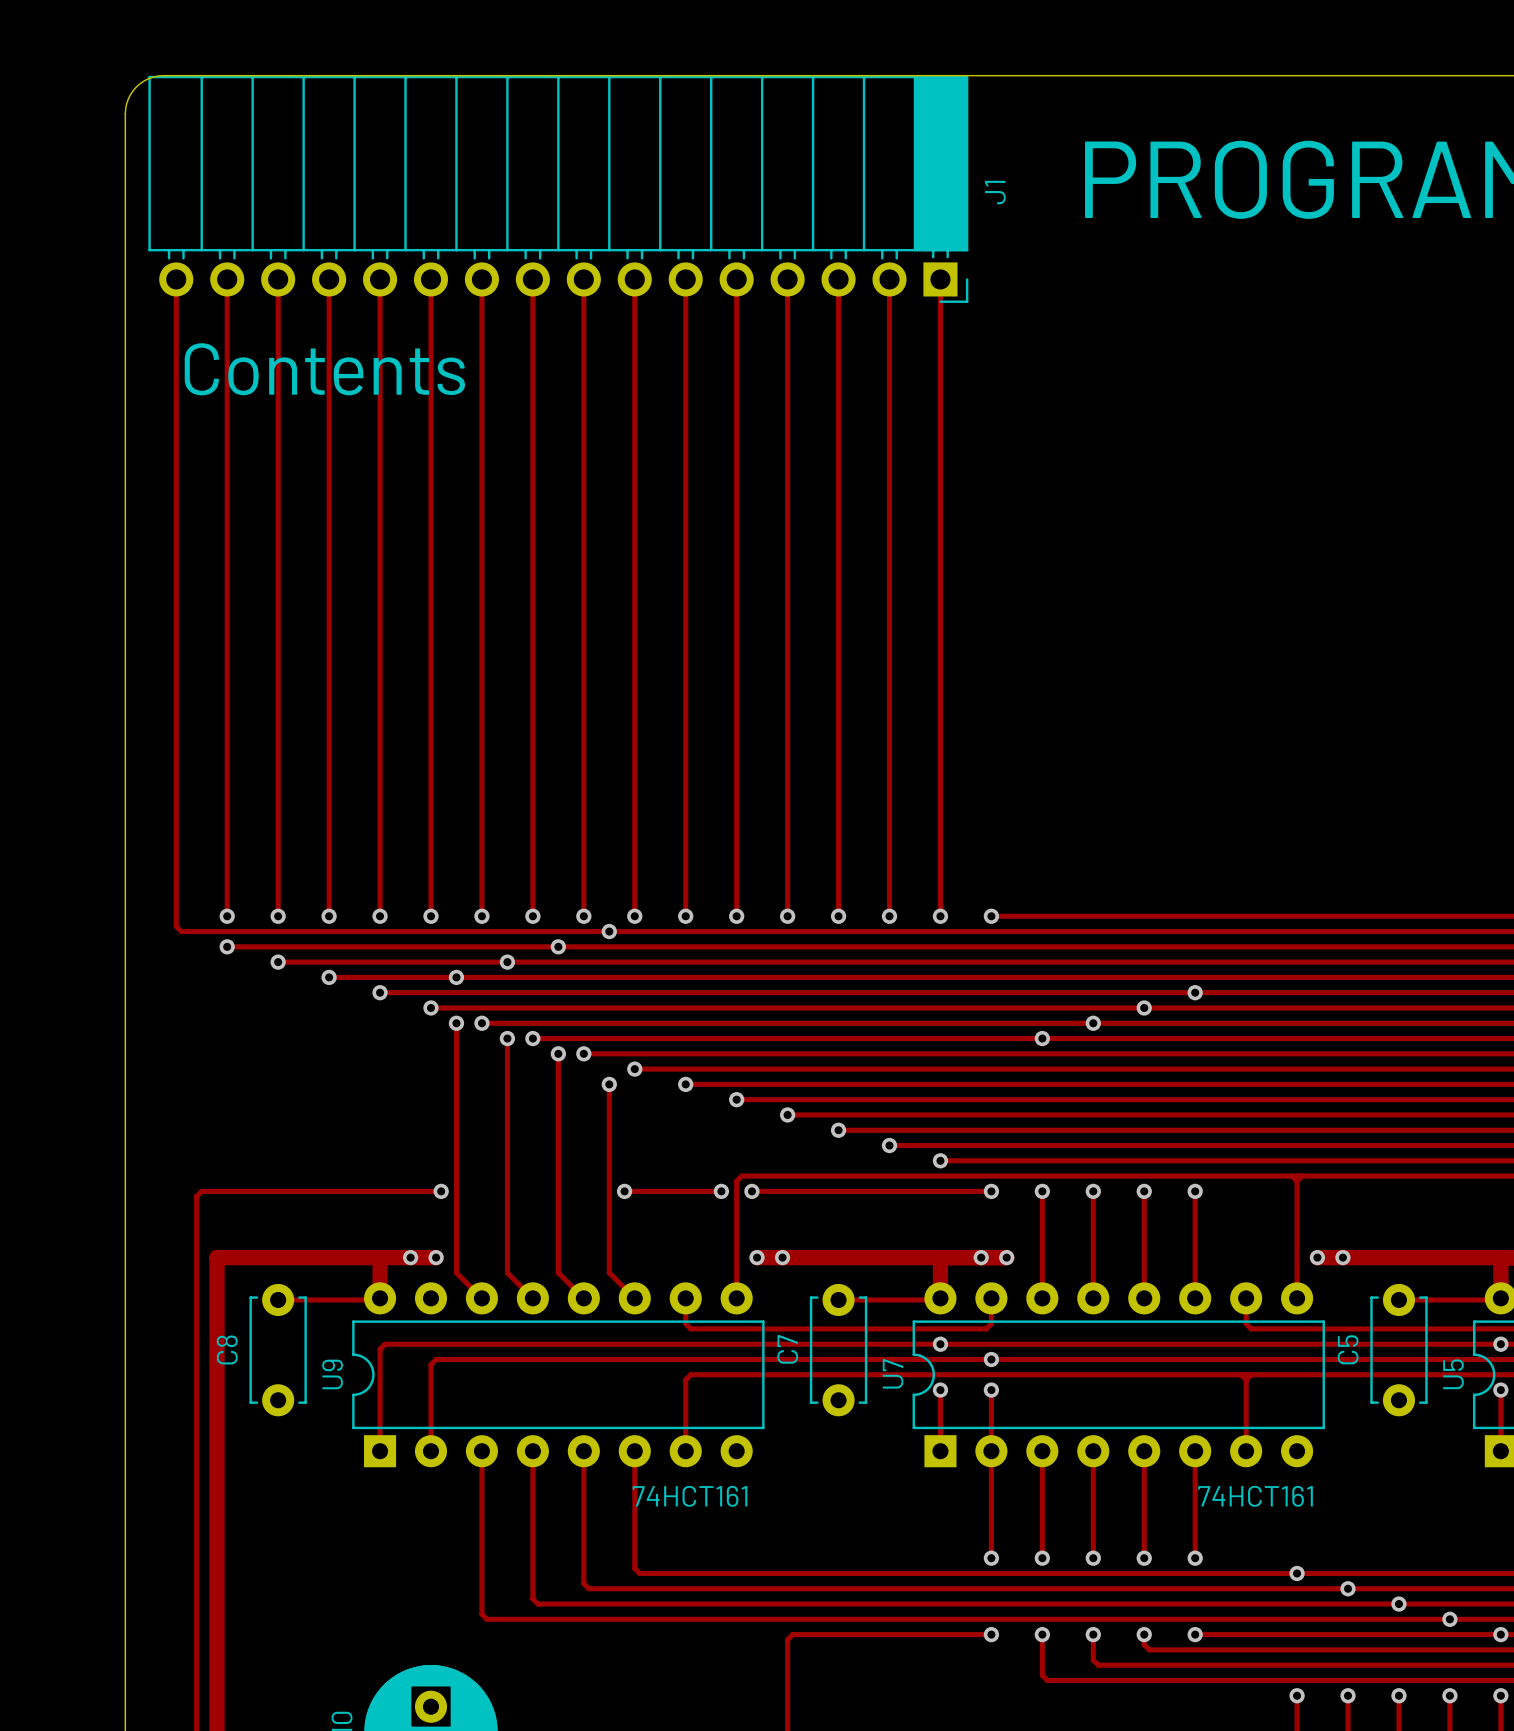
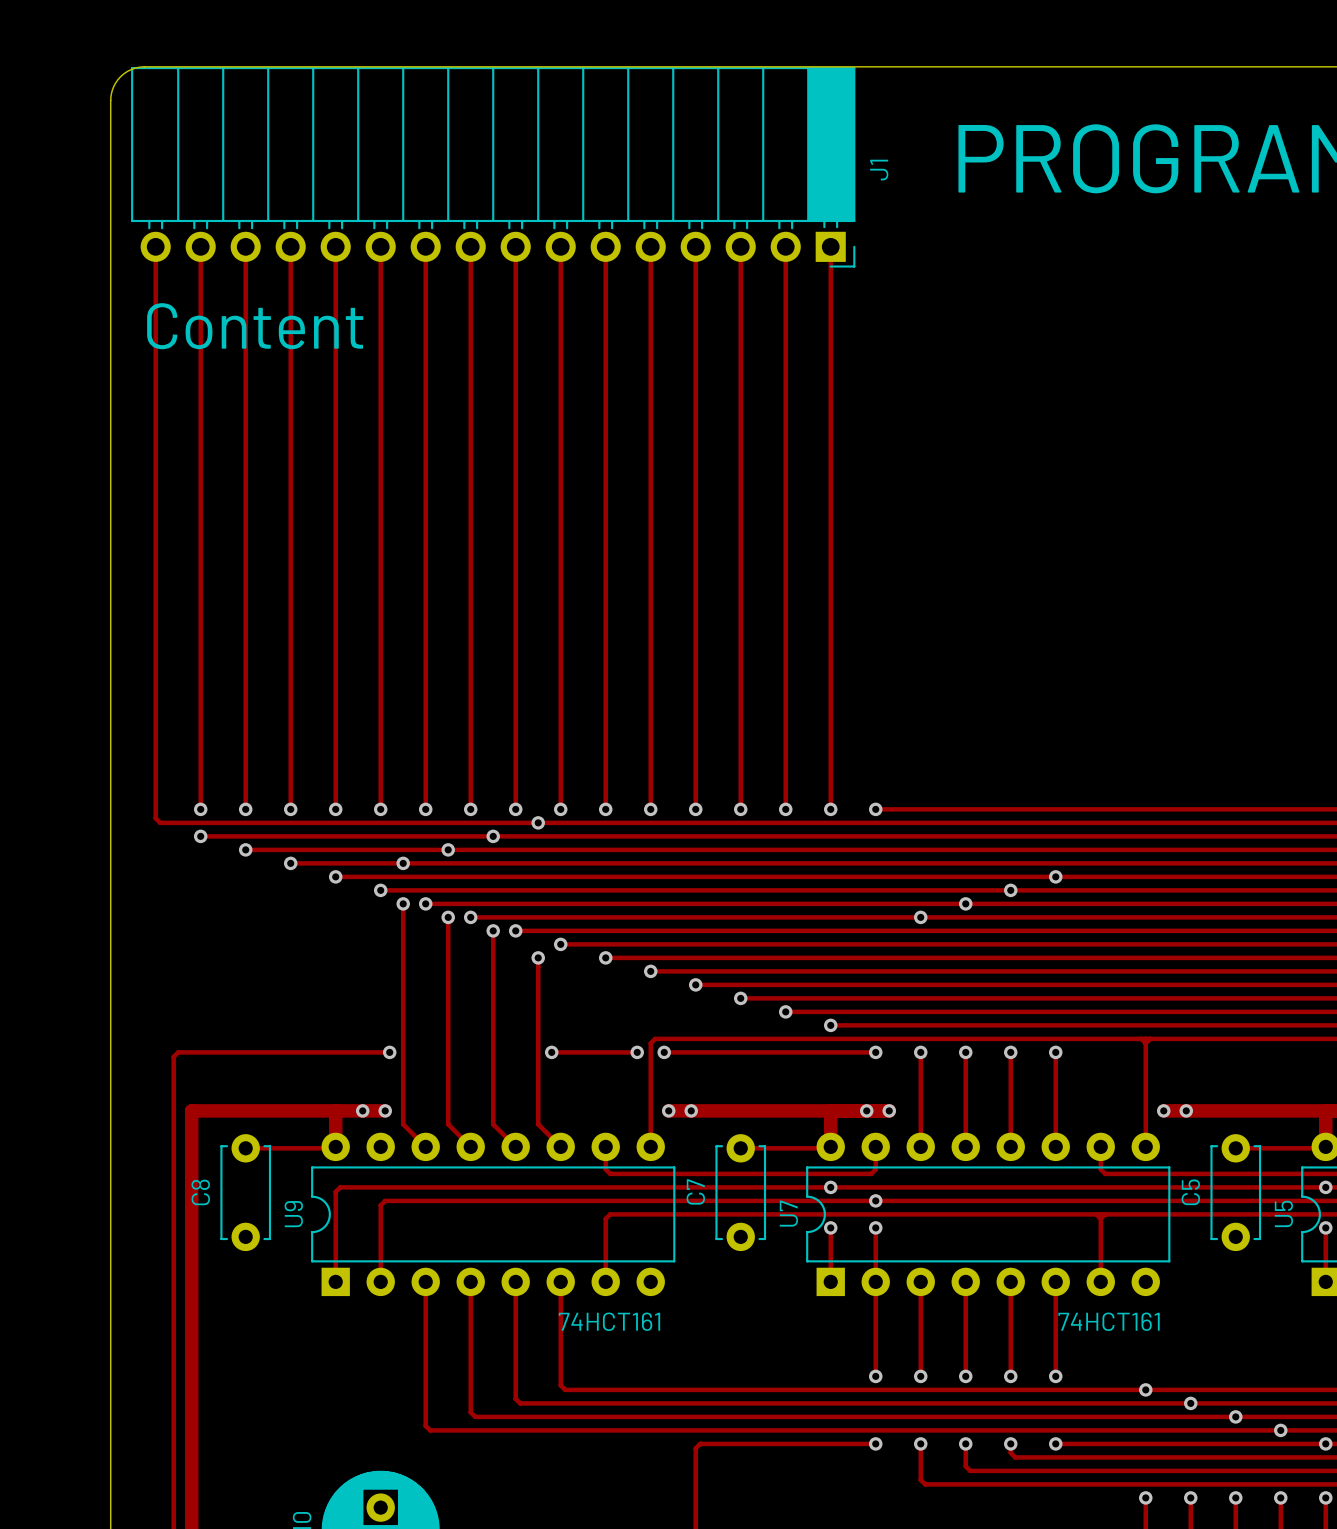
text: Contents (324, 369) -> Content (255, 326)

